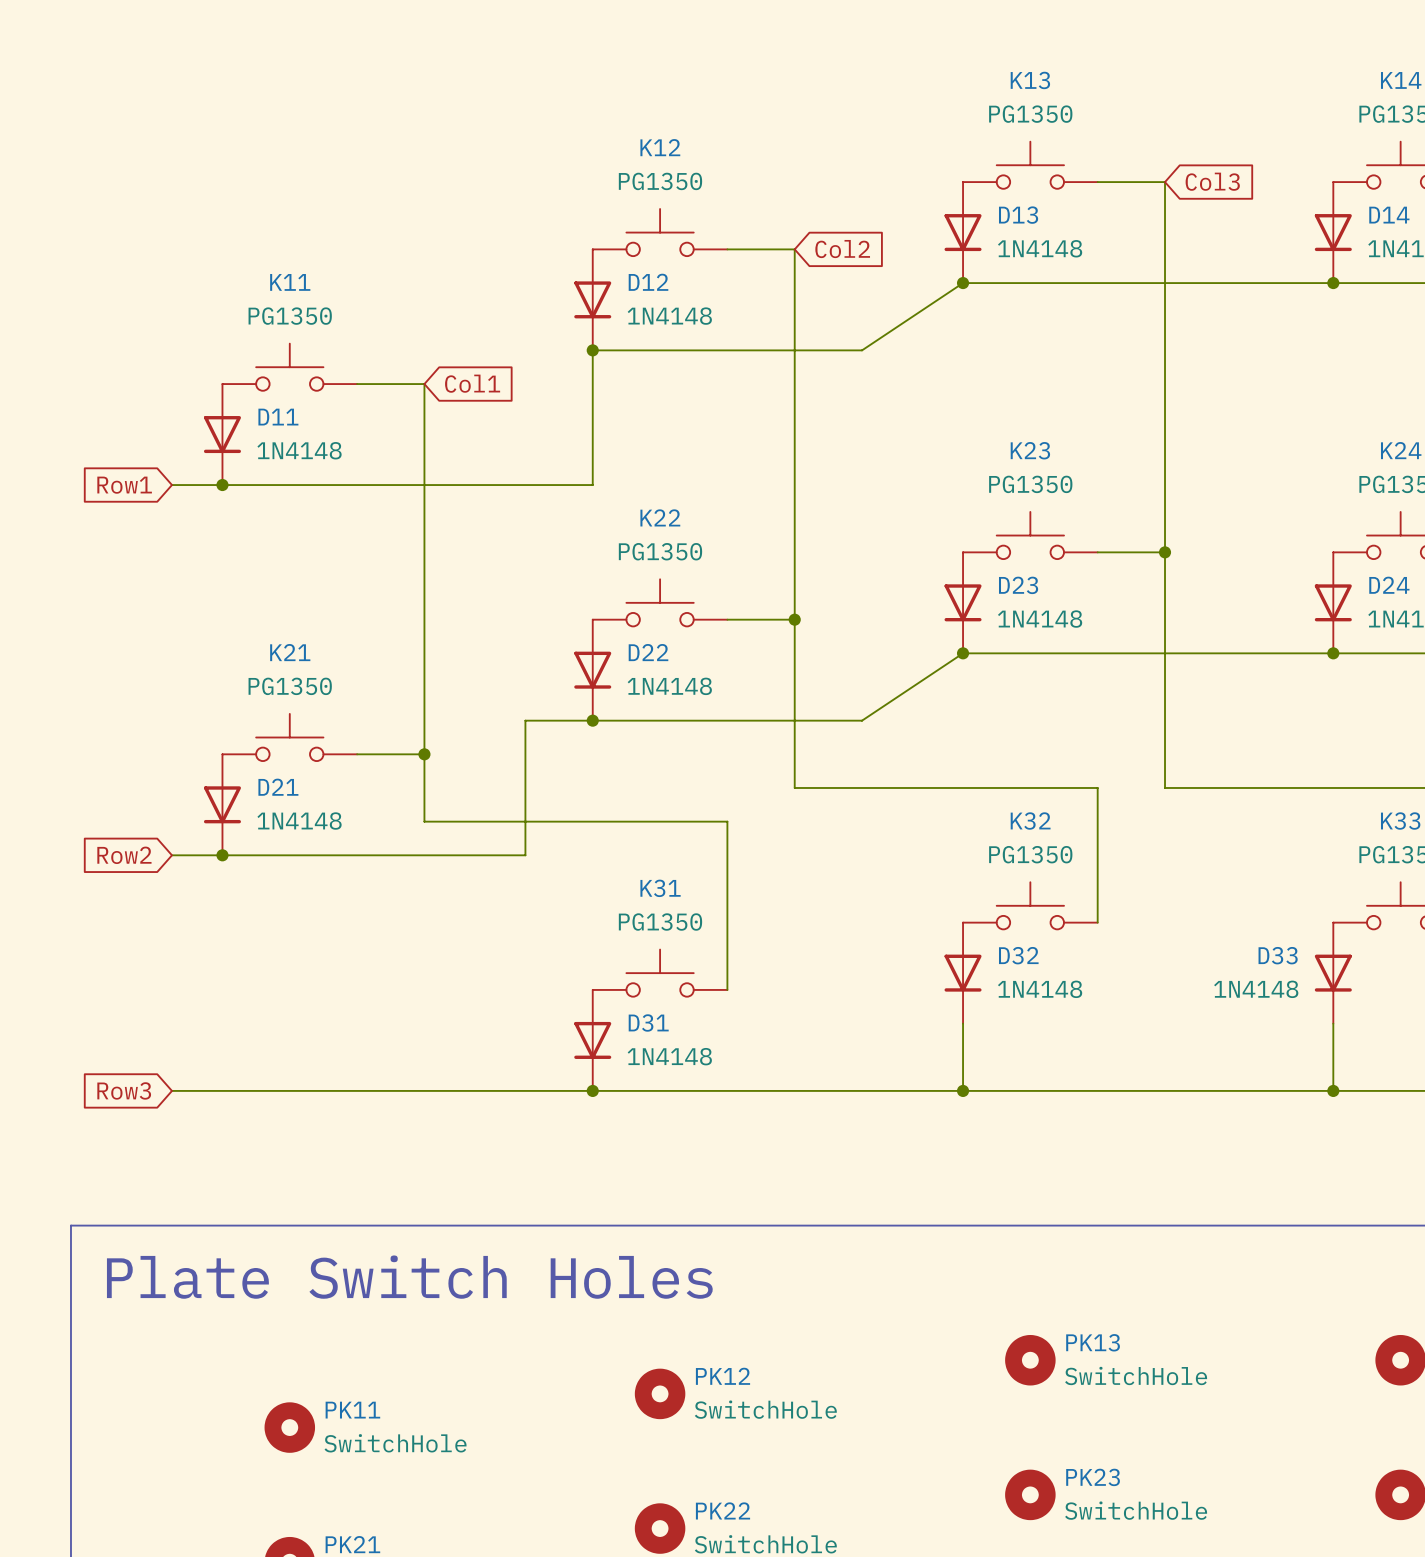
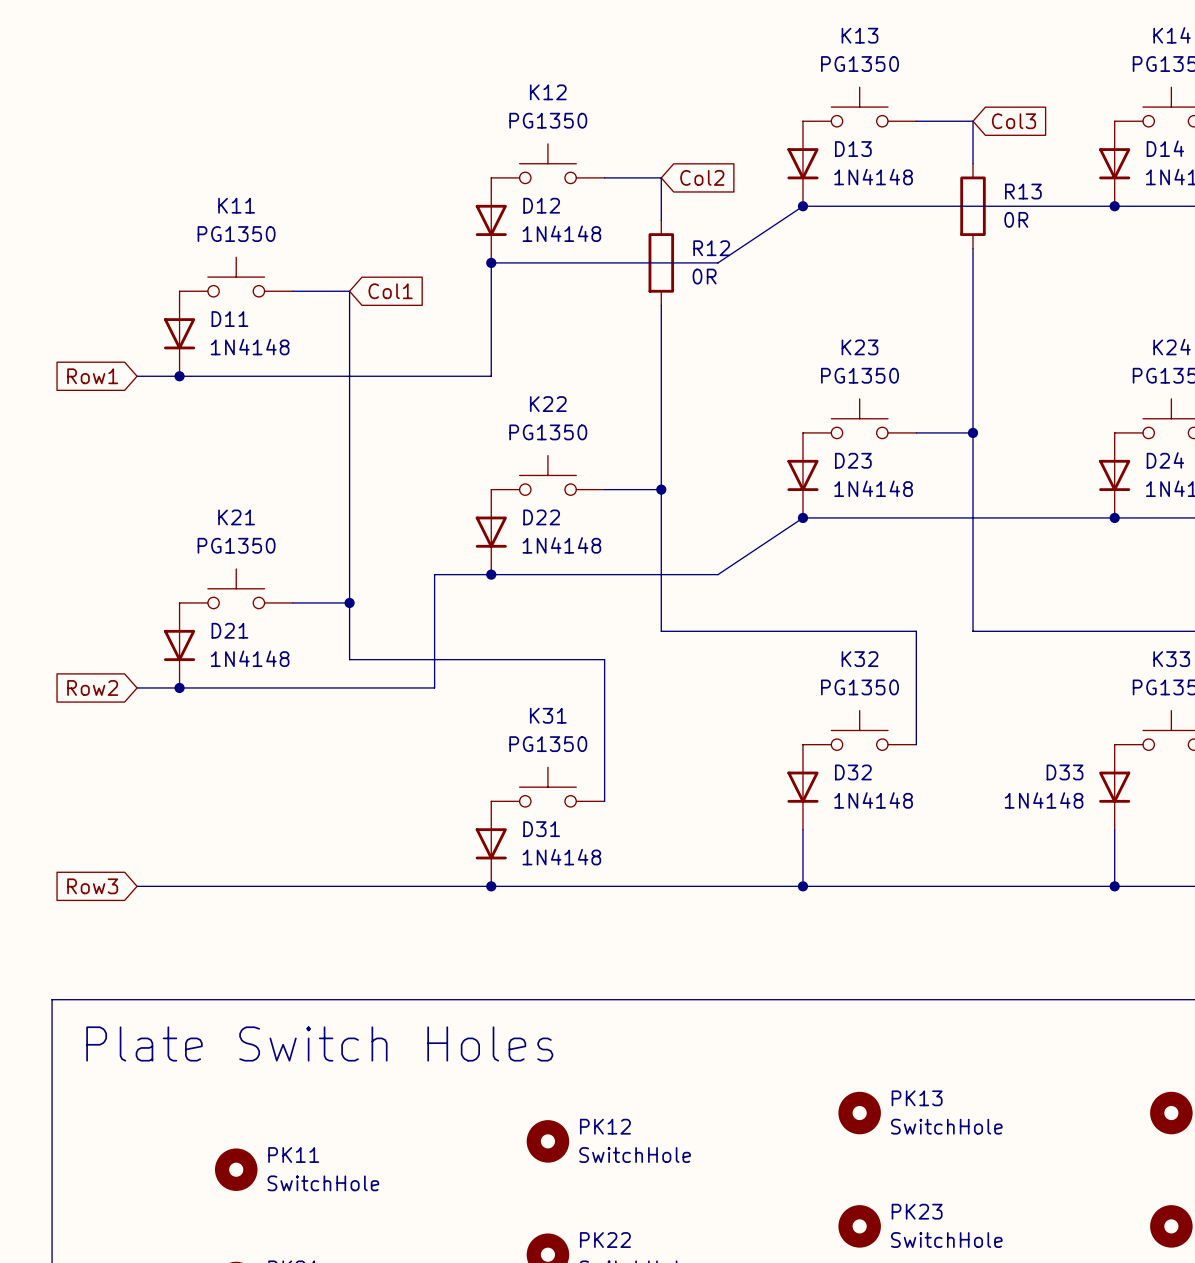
wire: (1165, 232) (1165, 333) -> none
R13: none -> 0R (973, 206)
wire: (794, 299) (794, 400) -> none
R12: none -> 0R (661, 262)

